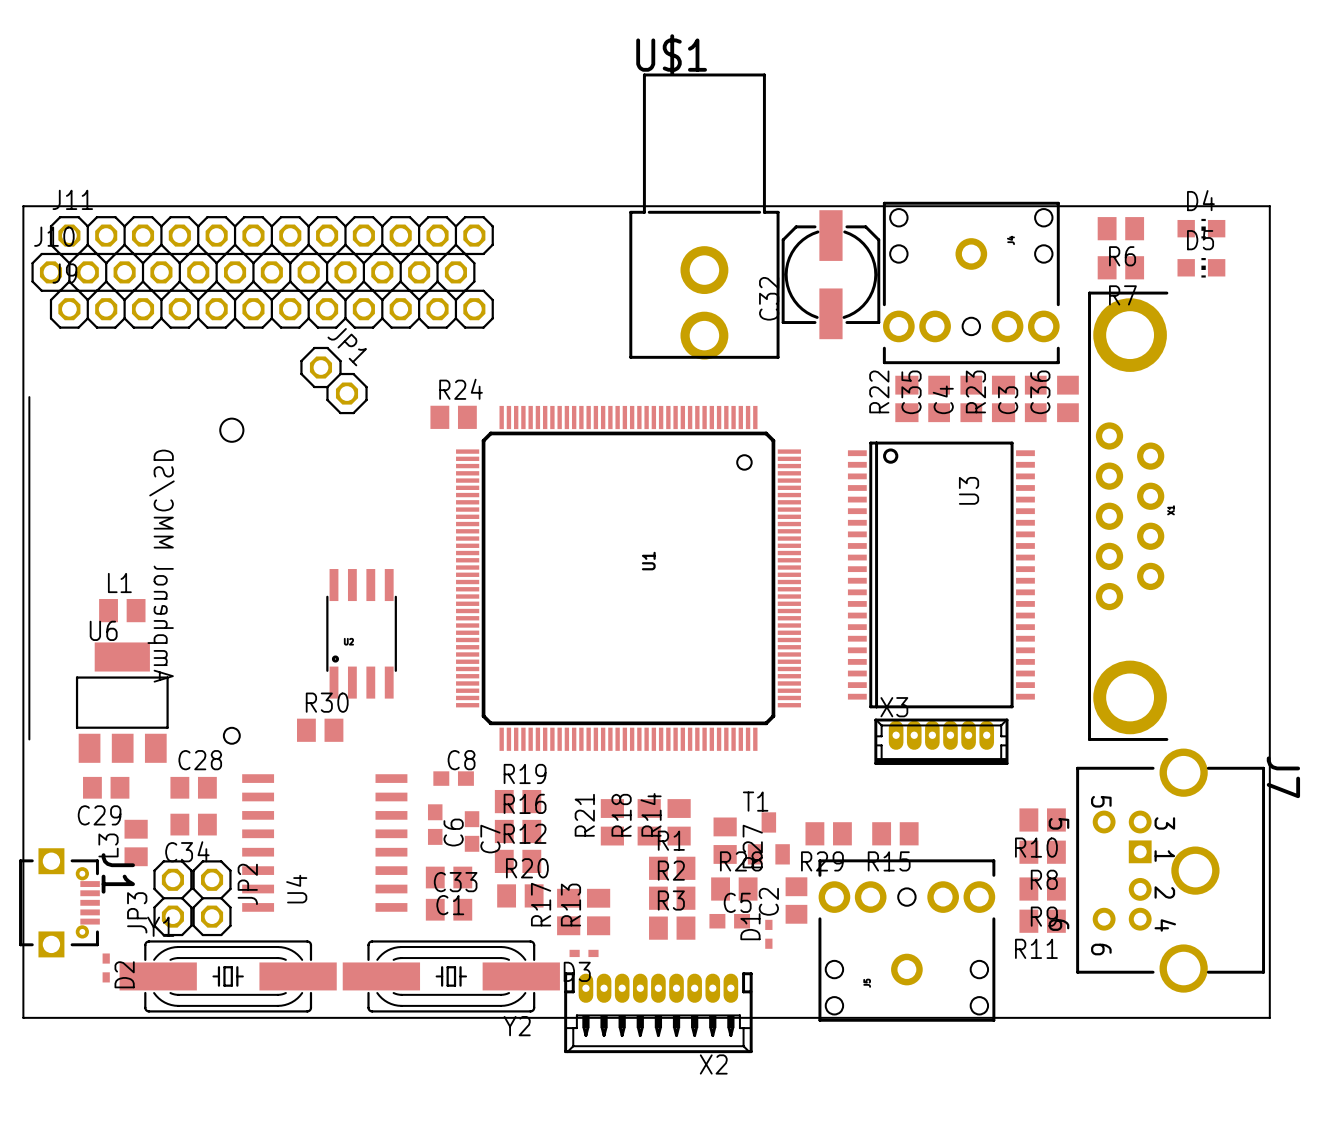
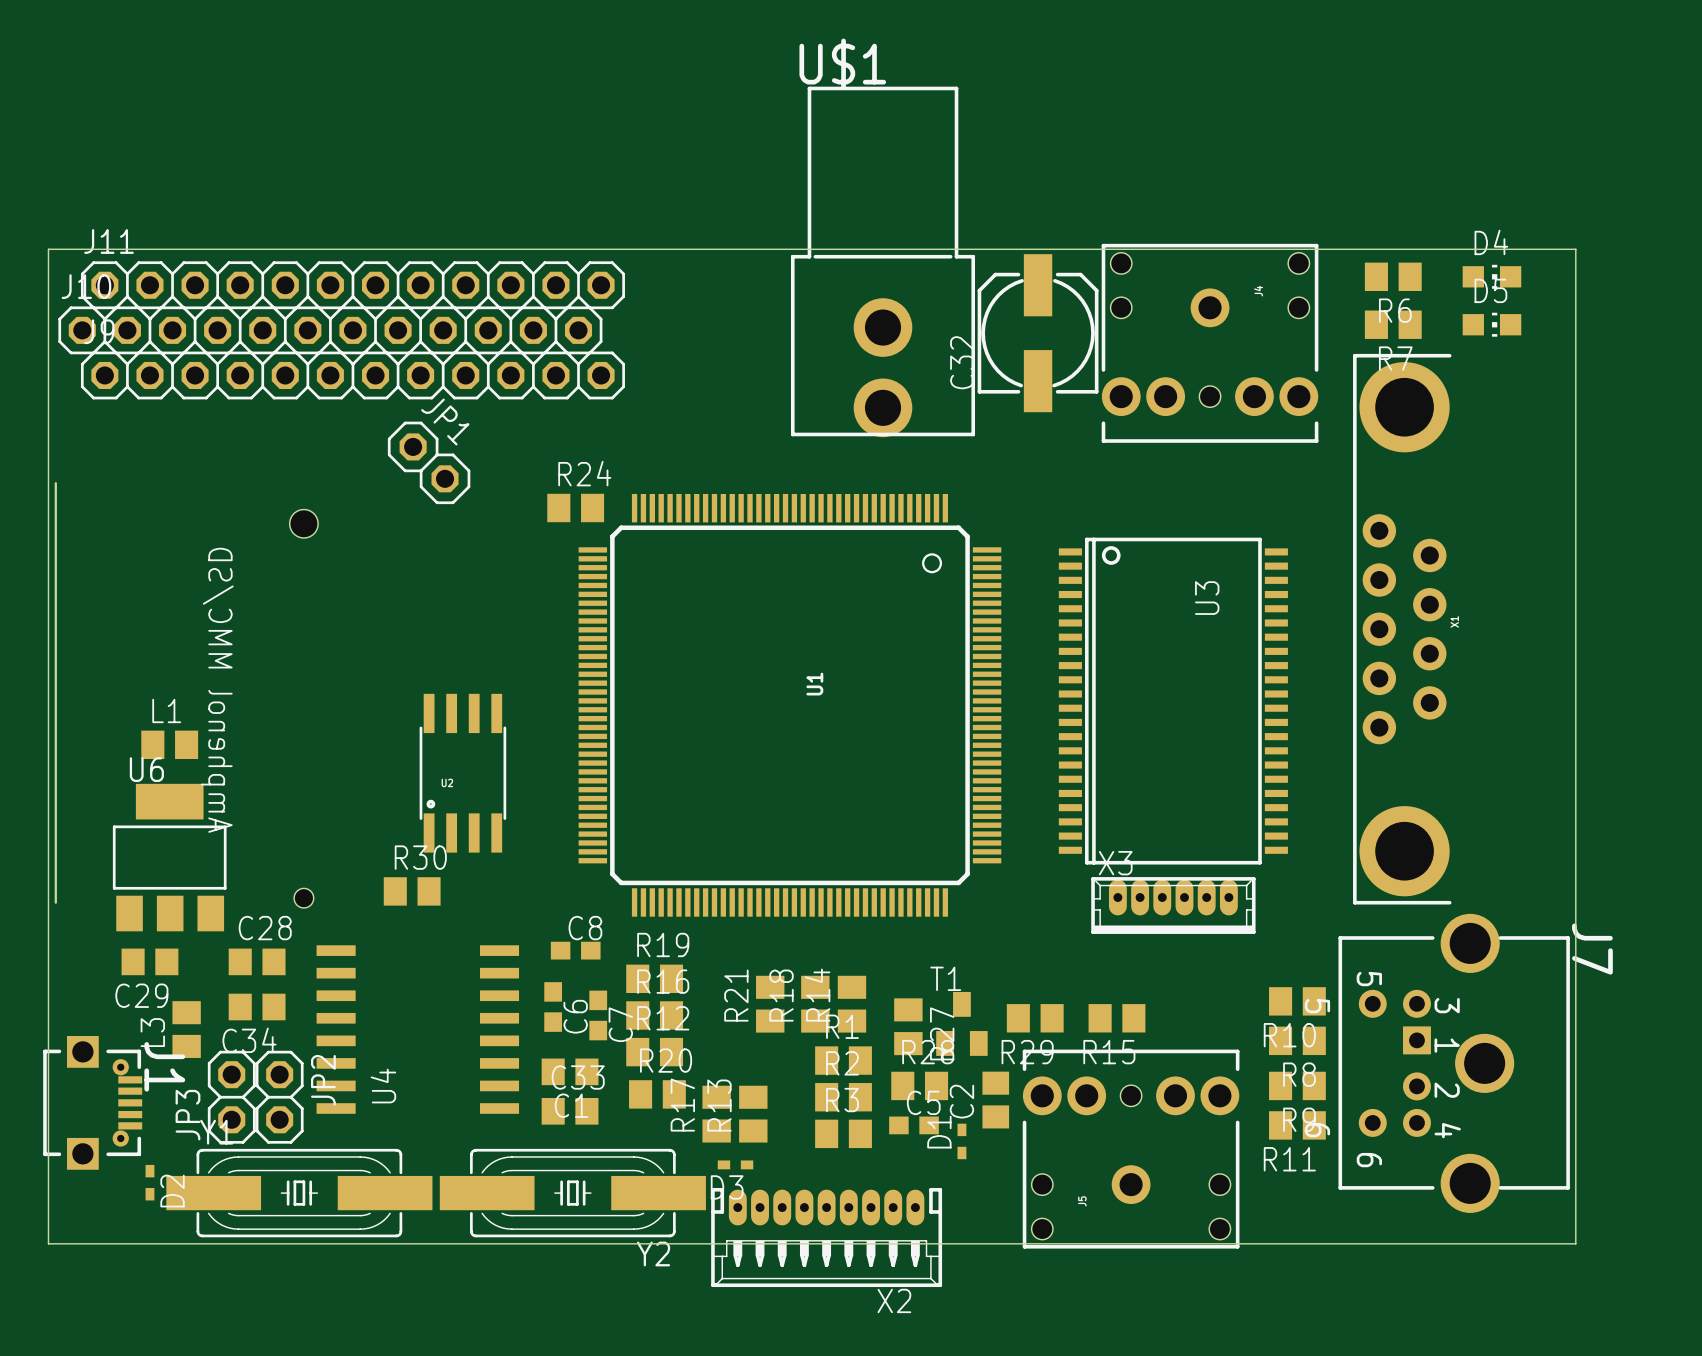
R22: (906, 398) -> none
C35: (939, 398) -> none
C4: (971, 398) -> none
R23: (1003, 398) -> none
C3: (1035, 398) -> none
C36: (1067, 398) -> none

